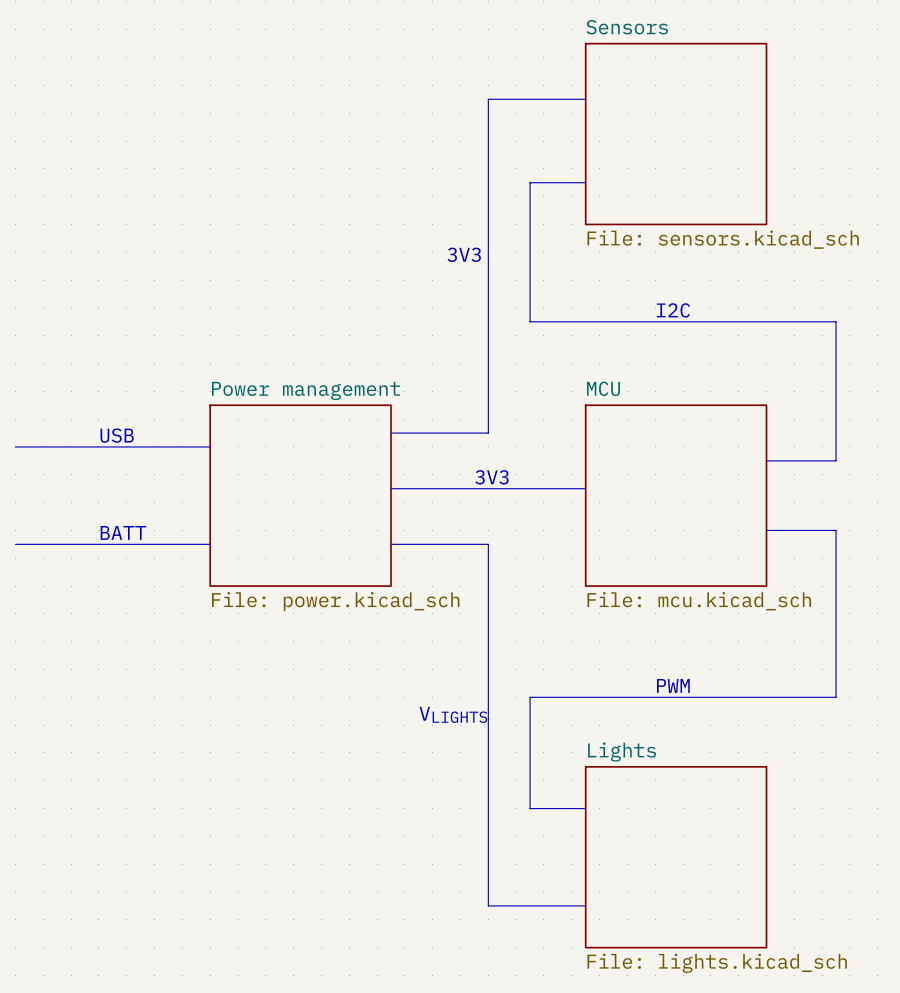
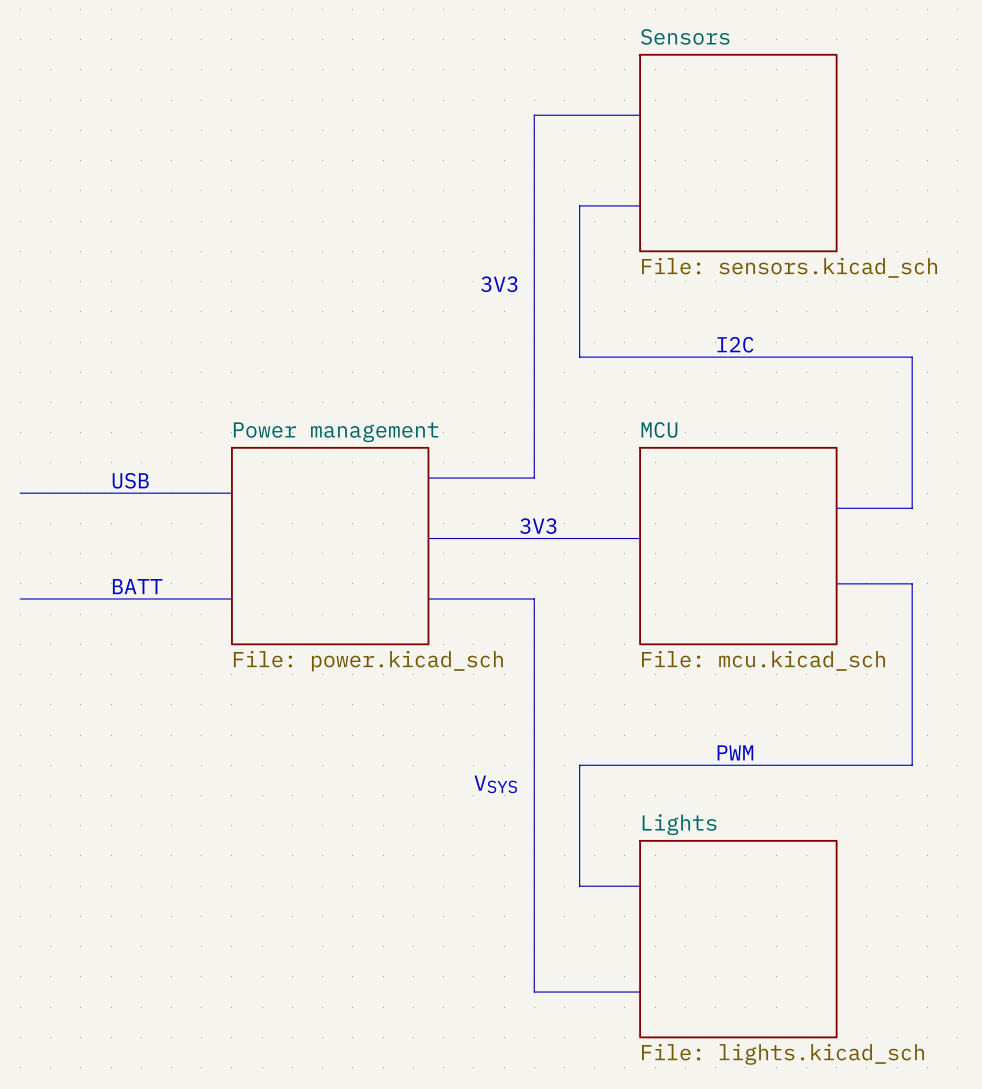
text position: 3V3 (464, 254) -> 3V3 (499, 284)
text: none -> VSYS (495, 784)
text: VLIGHTS (453, 714) -> none

